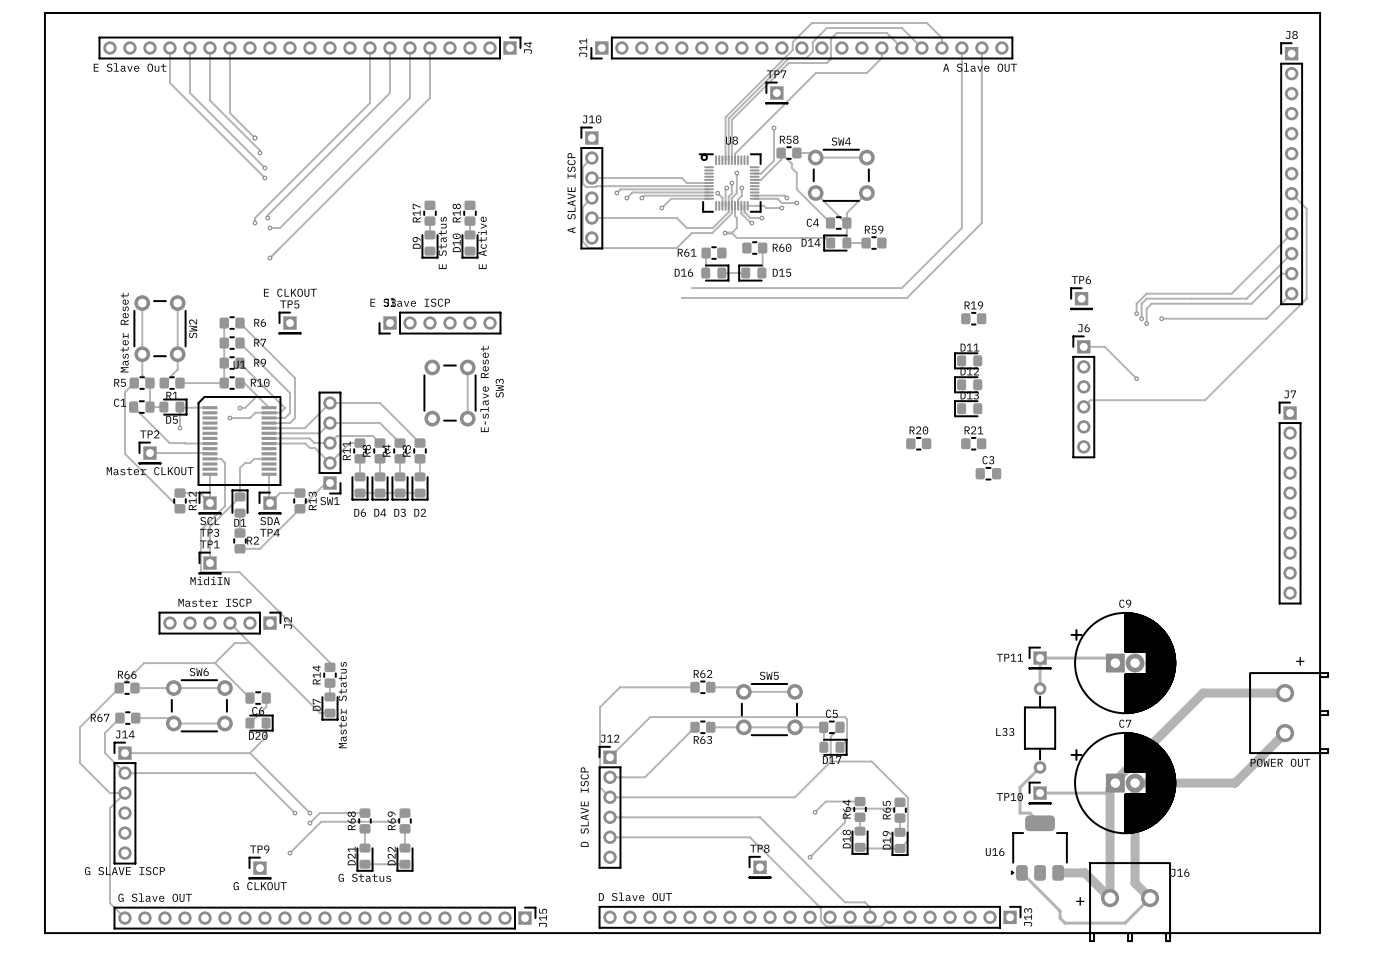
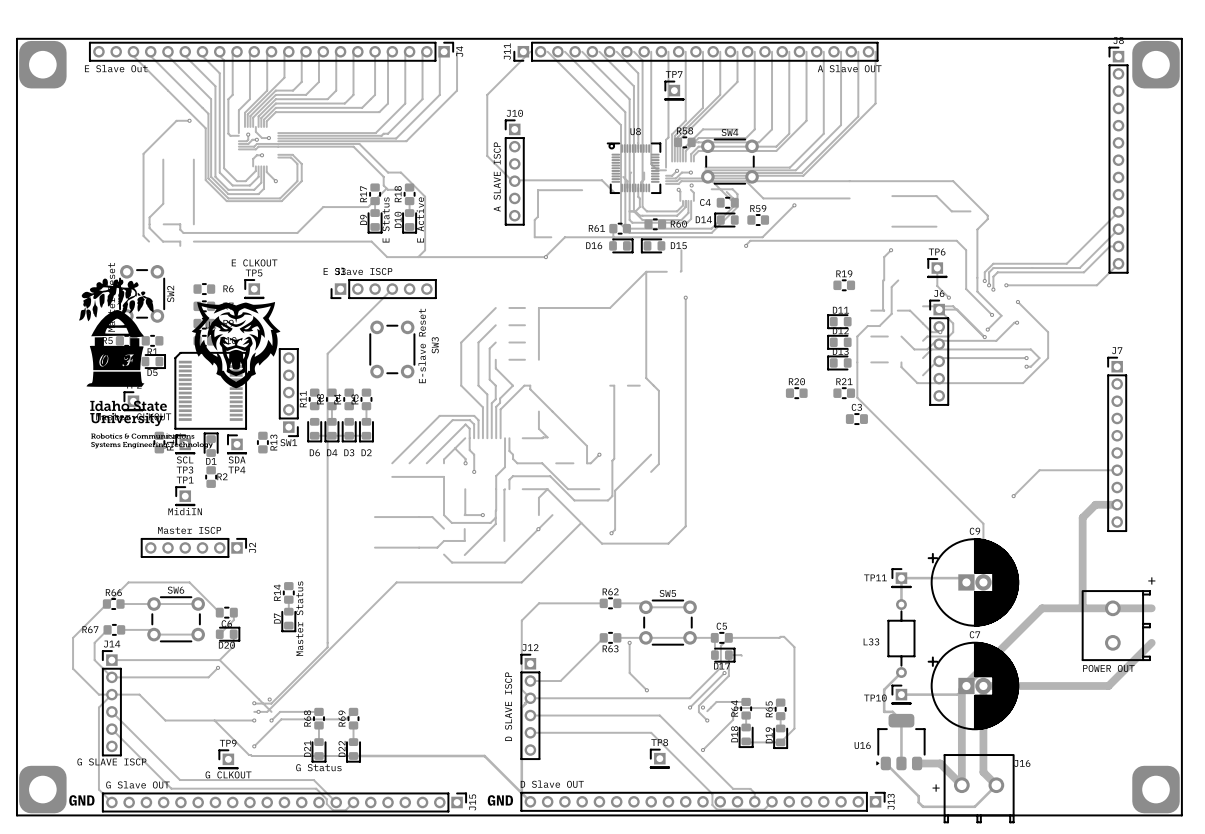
track: (169, 48) (169, 83) (264, 178) -> none
track: (189, 48) (189, 93) -> (129, 51) (167, 90)
track: none -> (180, 51) (215, 86) (215, 176) (228, 189) (254, 189) (261, 182) (261, 166)
track: (209, 48) (209, 100) (259, 150) (259, 153) -> none
track: none -> (198, 51) (219, 73) (219, 172) (232, 185) (249, 185) (258, 176) (258, 166)
track: (229, 48) (229, 113) -> (146, 51) (202, 107)
track: none -> (215, 51) (224, 60) (224, 168) (237, 181) (245, 181) (255, 170) (255, 166)
track: none -> (232, 51) (232, 94) (228, 99) (228, 133) (230, 135) (238, 135)
track: none -> (249, 51) (249, 99) (238, 110) (238, 133)
track: none -> (267, 51) (267, 90) (244, 112) (244, 126)
track: none -> (284, 51) (284, 77) (247, 114) (247, 126)
track: none -> (301, 51) (301, 81) (293, 90) (275, 90) (250, 115) (250, 126)
track: none -> (318, 51) (318, 81) (306, 94) (275, 94) (253, 117) (253, 126)
track: (369, 48) (369, 103) (254, 218) (254, 223) -> none
track: none -> (336, 51) (336, 90) (327, 99) (275, 99) (258, 116) (258, 126)
track: (389, 48) (389, 93) (267, 215) (267, 218) -> none
track: none -> (353, 51) (353, 94) (344, 103) (275, 103) (261, 118) (261, 126)
track: (409, 48) (409, 98) (301, 206) -> (264, 166) (264, 188)
track: none -> (388, 51) (388, 103) (379, 112) (275, 112) (266, 121) (266, 126)
track: none -> (405, 51) (405, 103) (375, 133) (278, 133)
track: none -> (422, 51) (422, 99) (388, 133) (381, 135) (278, 135)
track: none -> (439, 51) (439, 94) (396, 138) (278, 138)
track: none -> (457, 51) (457, 90) (406, 141) (278, 141)
track: none -> (530, 51) (487, 94) (487, 155) (513, 181) (602, 180) (614, 193)
track: none -> (547, 51) (621, 125) (621, 224) (629, 232) (711, 232) (737, 207) (737, 194) (732, 189) (711, 189)
track: none -> (564, 51) (625, 112) (625, 224) (629, 228) (711, 228) (733, 207) (733, 198) (726, 191)
track: none -> (582, 51) (629, 99) (629, 220) (632, 222) (687, 222) (691, 218) (691, 200)
track: none -> (599, 51) (633, 86) (633, 211) (642, 220) (681, 220) (688, 212) (688, 200)
track: none -> (633, 51) (642, 60) (642, 207) (646, 211) (677, 211) (683, 205) (683, 200)
track: none -> (651, 51) (651, 163) (657, 170) (666, 170)
track: none -> (668, 51) (668, 137) (666, 139) (666, 167)
track: none -> (685, 51) (685, 120) (672, 134) (672, 161)
track: none -> (702, 51) (702, 107) (674, 135) (674, 161)
track: none -> (720, 51) (720, 94) (677, 137) (677, 161)
track: none -> (737, 51) (737, 81) (680, 139) (680, 161)
track: none -> (754, 51) (754, 129) (746, 138) (698, 138) (685, 150) (685, 161)
track: (881, 48) (881, 58) (866, 73) (815, 73) (735, 153) -> (616, 51) (638, 73) (638, 143)
track: (901, 48) (886, 33) (836, 33) (830, 38) (830, 58) (826, 63) (788, 63) (731, 119) (731, 160) -> none
track: none -> (789, 51) (789, 133) (776, 146) (698, 146) (691, 154) (691, 161)
track: (921, 48) (901, 28) (826, 28) (812, 42) (812, 51) (806, 58) (789, 58) (728, 118) (728, 160) -> none
track: none -> (806, 51) (806, 120) (776, 150) (698, 150) (693, 155) (693, 161)
track: (941, 48) (941, 38) (926, 23) (811, 23) (792, 42) (792, 50) (725, 117) (725, 160) -> none
track: none -> (823, 51) (823, 133) (789, 167) (705, 167)
track: (961, 48) (961, 228) (901, 288) (691, 288) -> none
track: none -> (841, 51) (841, 125) (795, 170) (705, 170)
track: (981, 48) (981, 223) (906, 298) (681, 298) -> none
track: none -> (858, 51) (858, 116) (801, 173) (705, 173)
track: none -> (875, 51) (875, 103) (803, 175) (705, 175)
part: none -> (42, 64)
part: none -> (1156, 64)
track: (414, 113) (269, 258) -> (362, 107) (275, 107) (264, 119) (264, 126)
track: (236, 119) (254, 138) -> (208, 113) (208, 178) (228, 198) (280, 198) (297, 181) (297, 163) (291, 157) (278, 157)
track: none -> (189, 120) (176, 120) (143, 153) (143, 236) (149, 241)
via: none -> (189, 120)
track: (774, 128) (774, 160) (761, 173) (754, 173) -> none
via: (774, 128) -> none
track: none -> (255, 126) (255, 131) (262, 138) (268, 138)
track: (233, 136) (264, 168) -> (205, 128) (205, 180) (226, 201) (281, 201) (301, 181) (301, 163) (292, 154) (278, 154)
via: (254, 138) -> none
track: none -> (737, 129) (702, 129) (683, 149) (683, 161)
track: none -> (248, 134) (246, 141) (238, 141)
via: none -> (248, 134)
via: none -> (268, 138)
track: none -> (256, 139) (252, 139) (248, 143) (238, 143)
via: none -> (256, 139)
via: (259, 153) -> none
track: (811, 153) (815, 157) (866, 157) -> (703, 142) (759, 142) (772, 129) (772, 51)
track: none -> (238, 146) (254, 146) (256, 143) (359, 143) (388, 172) (400, 172) (425, 196) (425, 250) (418, 257)
track: (591, 158) (582, 167) (582, 183) (586, 187) (709, 186) -> none
track: none -> (238, 149) (255, 149) (258, 146) (353, 146) (383, 176) (383, 185) (388, 189) (400, 189)
via: (264, 168) -> none
track: none -> (262, 155) (256, 155) (253, 159) (253, 166)
via: none -> (262, 155)
track: none -> (163, 159) (163, 203) (149, 217) (149, 228) (163, 241) (180, 241) (180, 245)
track: none -> (193, 159) (193, 224)
track: (736, 173) (736, 193) (731, 198) (731, 213) (712, 233) (691, 233) (676, 248) (589, 248) (582, 241) (582, 207) (591, 198) -> none
via: (736, 173) -> none
via: (264, 178) -> none
track: (591, 178) (681, 178) (686, 183) (709, 183) -> none
track: (754, 179) (761, 179) (781, 159) (781, 153) (791, 163) (791, 168) (796, 173) (796, 189) (830, 223) -> none
track: none -> (266, 166) (266, 172) (275, 181)
track: (731, 183) (731, 193) (728, 196) (728, 212) (712, 228) (686, 228) (676, 218) (591, 218) -> none
via: (731, 183) -> none
track: none -> (677, 170) (672, 175) (666, 175)
via: none -> (677, 170)
via: (726, 188) -> none
via: (741, 188) -> none
track: none -> (690, 172) (681, 172) (675, 178) (666, 178)
via: none -> (690, 172)
track: (709, 189) (620, 189) (616, 193) -> none
track: (709, 192) (632, 192) (626, 198) -> none
via: (616, 193) -> none
via: (717, 193) -> none
track: (866, 193) (846, 213) (846, 243) (866, 243) -> none
track: (1291, 193) (1306, 208) (1306, 298) (1205, 400) (1090, 400) (1083, 406) -> none
track: (709, 195) (644, 195) (641, 198) -> none
track: (754, 195) (784, 195) (786, 198) -> none
via: none -> (275, 181)
via: (626, 198) -> none
via: (641, 198) -> none
track: (709, 198) (671, 198) (661, 208) -> none
track: (754, 198) (777, 198) (781, 203) (796, 203) -> none
track: none -> (666, 181) (677, 181) (679, 178) (747, 178) (750, 181) (953, 181) (987, 215) (987, 219) (977, 229) (977, 291) (1001, 315) (987, 329)
via: (786, 198) -> none
track: none -> (666, 183) (678, 183) (681, 181) (746, 181) (763, 198) (849, 198)
track: (741, 205) (741, 213) (751, 223) -> none
track: (744, 205) (744, 212) (750, 218) (761, 218) -> none
track: (747, 205) (781, 208) -> none
track: none -> (386, 188) (368, 207) (323, 207) (297, 232) (183, 232) (180, 229) (180, 224) (163, 224)
via: (661, 208) -> none
track: none -> (582, 190) (538, 190) (538, 216) (534, 220) (534, 237) (551, 237)
track: none -> (690, 189) (693, 192) (693, 200)
track: none -> (680, 191) (680, 200)
track: (294, 213) (279, 228) (269, 228) -> (258, 194) (228, 194) (211, 176) (211, 99) (163, 51)
track: none -> (892, 196) (936, 196) (951, 211) (970, 211)
via: (267, 218) -> none
via: (761, 218) -> none
via: (254, 223) -> none
via: (751, 223) -> none
track: none -> (794, 205) (762, 237) (564, 237) (545, 257) (387, 257) (371, 241) (193, 241)
via: none -> (794, 205)
via: (269, 228) -> none
via: (725, 233) -> none
track: (780, 238) (825, 238) (830, 243) -> (677, 215) (685, 207) (685, 200)
track: (762, 248) (761, 273) -> (681, 250) (680, 271)
track: none -> (892, 226) (936, 226)
via: (269, 258) -> none
track: (721, 273) (745, 273) -> (646, 271) (666, 271)
track: none -> (746, 245) (750, 240) (956, 240) (966, 250) (966, 289) (992, 314)
via: none -> (746, 245)
track: none -> (891, 250) (884, 257) (884, 280)
via: none -> (891, 250)
via: none -> (545, 257)
track: none -> (937, 268) (937, 286) (948, 297)
track: (142, 303) (142, 375) (149, 383) (149, 407) (163, 407) -> none
track: (177, 303) (177, 369) (164, 383) -> none
track: none -> (646, 271) (646, 378) (658, 390) (658, 464) (651, 471)
track: none -> (646, 271) (610, 307) (538, 307) (538, 359)
drawing: none -> [79, 278, 154, 387]
track: none -> (883, 280) (884, 310) (871, 310)
track: none -> (898, 280) (891, 287) (891, 313) (879, 326) (867, 326) (857, 336) (857, 397) (983, 523) (983, 582)
track: (224, 323) (224, 383) (179, 383) -> none
track: (239, 323) (294, 378) (294, 418) (289, 423) (269, 423) -> none
track: none -> (388, 293) (327, 353) (327, 647) (271, 703) (254, 703)
track: none -> (685, 297) (685, 526) (668, 543) (601, 543) (547, 489)
via: none -> (685, 297)
via: none -> (948, 297)
drawing: none -> [191, 301, 281, 389]
track: none -> (1017, 301) (1048, 332) (1048, 358) (1023, 383) (917, 383) (901, 367) (901, 362)
via: none -> (1017, 301)
track: (239, 343) (289, 393) (289, 413) (284, 418) (269, 417) -> none
track: none -> (923, 306) (953, 306) (983, 336)
track: none -> (495, 307) (461, 342) (461, 385) (482, 407) (482, 438)
track: none -> (509, 307) (525, 307)
track: none -> (897, 310) (910, 310) (931, 332) (940, 332)
track: none -> (944, 314) (953, 323) (953, 332) (948, 336) (927, 336) (923, 340)
via: none -> (992, 314)
track: none -> (1017, 322) (1014, 322) (996, 340) (935, 340) (927, 349) (914, 349) (901, 336)
via: none -> (1017, 322)
track: (239, 363) (284, 408) (280, 412) (255, 412) (249, 418) (229, 418) -> none
track: none -> (495, 325) (478, 342) (478, 385) (487, 394) (487, 438)
track: none -> (509, 325) (525, 325)
track: (467, 367) (467, 418) -> none
via: none -> (987, 329)
via: none -> (940, 332)
track: none -> (871, 336) (887, 336)
track: (134, 383) (124, 392) (124, 453) (179, 508) -> none
track: (239, 383) (244, 383) (269, 407) -> none
track: none -> (495, 342) (489, 348) (489, 379) (495, 385) (495, 399) (491, 403) (491, 438)
track: none -> (509, 342) (525, 342)
track: (257, 395) (244, 408) (239, 408) -> none
track: none -> (923, 358) (931, 349) (1030, 349) (1039, 358) (1030, 366) (1026, 366)
track: none -> (1026, 358) (940, 358) (923, 375)
via: none -> (1026, 358)
track: none -> (495, 359) (495, 368) (513, 385) (500, 398) (500, 402) (496, 406) (496, 438)
track: none -> (509, 359) (525, 359)
track: (133, 407) (169, 443) (209, 443) -> none
track: (209, 407) (179, 407) (179, 428) -> none
via: (239, 408) -> none
track: none -> (871, 362) (887, 362)
via: none -> (1026, 366)
via: (229, 418) -> none
via: (179, 428) -> none
track: (269, 428) (304, 428) (329, 403) (379, 403) (420, 443) -> none
track: (269, 433) (319, 433) (329, 423) (379, 423) (400, 443) -> none
track: none -> (610, 385) (614, 385) (612, 496) (608, 500) (574, 500) (550, 476) (512, 476) (509, 479) (509, 489)
track: none -> (627, 385) (639, 385)
track: (269, 438) (309, 438) (314, 443) (329, 443) (337, 435) (372, 435) (380, 443) -> none
track: (360, 443) (349, 443) (329, 463) (315, 448) (309, 448) (305, 443) (269, 443) -> none
drawing: none -> [90, 400, 213, 449]
track: (149, 453) (209, 453) -> none
track: (209, 458) (221, 458) (224, 462) (224, 506) (200, 530) (200, 572) (239, 572) (329, 662) (329, 667) -> none
track: (269, 458) (254, 458) (239, 468) (239, 496) (209, 526) (209, 563) -> none
track: (360, 458) (360, 476) -> none
track: (400, 458) (400, 476) -> none
track: none -> (538, 411) (538, 428) (547, 437) (522, 438)
track: (209, 474) (209, 503) (199, 493) (179, 493) -> none
track: (269, 474) (269, 503) (279, 493) (299, 493) -> none
track: (329, 483) (325, 483) (259, 548) (239, 548) -> none
track: none -> (465, 438) (444, 459) (444, 463)
track: none -> (474, 438) (474, 424) (469, 420) (452, 420) (409, 463)
track: none -> (478, 438) (478, 420) (474, 415) (439, 415) (392, 463)
track: none -> (500, 438) (500, 409) (524, 385) (530, 385) (530, 389) (587, 446) (587, 463) (590, 463) (599, 454)
track: none -> (505, 438) (505, 467) (496, 475) (495, 524) (464, 555)
track: none -> (509, 438) (509, 451) (517, 463) (542, 463) (568, 489) (599, 489)
track: none -> (455, 448) (465, 459) (465, 463)
track: (239, 513) (239, 533) -> none
via: none -> (599, 454)
track: none -> (651, 454) (615, 490) (615, 529) (611, 533)
track: none -> (426, 463) (465, 424) (469, 428) (469, 450) (474, 454) (474, 471)
via: none -> (465, 463)
track: none -> (556, 463) (573, 463)
track: none -> (1117, 470) (1039, 470) (1013, 496)
via: none -> (474, 471)
track: none -> (392, 476) (444, 476) (444, 515) (451, 522) (490, 522) (495, 517)
track: none -> (465, 489) (464, 515) (482, 515)
track: none -> (505, 489) (504, 540)
track: none -> (522, 489) (547, 489)
track: none -> (547, 489) (538, 497) (538, 515)
via: none -> (1013, 496)
track: none -> (1117, 504) (1095, 504) (1082, 517) (1082, 608)
via: none -> (482, 515)
track: none -> (552, 515) (505, 562) (451, 562) (444, 554)
track: none -> (374, 517) (432, 517) (444, 528)
track: none -> (581, 522) (521, 582) (396, 582) (267, 711) (254, 711)
track: none -> (464, 529) (464, 540) (444, 540) (437, 547) (374, 547)
via: none -> (538, 529)
via: none -> (611, 533)
track: (229, 623) (319, 713) (329, 713) -> none
track: (249, 643) (234, 643) (214, 663) -> none
text position: + (1300, 661) -> + (1151, 580)
track: none -> (1112, 608) (1151, 608)
track: none -> (629, 642) (629, 673) (646, 690)
via: none -> (629, 642)
track: (1285, 733) (1235, 783) -> (1151, 642) (1108, 685) (1069, 685)
track: (840, 747) (847, 740) (847, 719) (844, 717) (650, 717) (610, 757) -> none
track: none -> (741, 655) (728, 655) (728, 675) (698, 705) (698, 712) (707, 720)
track: (830, 761) (871, 761) (907, 797) (907, 840) -> (728, 637) (784, 636) (794, 647) (794, 728) (787, 735)
via: none -> (218, 667)
track: none -> (724, 673) (690, 707)
via: none -> (724, 673)
track: (236, 773) (254, 773) (294, 813) -> (208, 677) (218, 667)
via: none -> (646, 690)
track: none -> (111, 694) (139, 694) (165, 720) (254, 720)
track: none -> (530, 698) (521, 707) (521, 793)
via: none -> (269, 699)
via: none -> (254, 703)
via: none -> (690, 707)
via: none -> (702, 707)
via: (815, 812) -> none
track: none -> (111, 711) (180, 780) (313, 780) (336, 802)
via: (309, 813) -> none
track: none -> (214, 720) (251, 756) (318, 756)
via: none -> (254, 720)
via: none -> (707, 720)
track: none -> (901, 720) (901, 763)
track: none -> (111, 729) (171, 788) (316, 788) (326, 799) (326, 804) (333, 810) (345, 810) (353, 802)
track: none -> (353, 756) (484, 756) (530, 801)
part: none -> (42, 789)
part: none -> (1156, 789)
text: none -> GND (81, 800)
text: none -> GND (500, 800)
board edge: (44, 933) (44, 13) (1320, 13) (1320, 933) -> (42, 815) (16, 815) (16, 38) (1181, 38) (1181, 815) (1143, 815)

